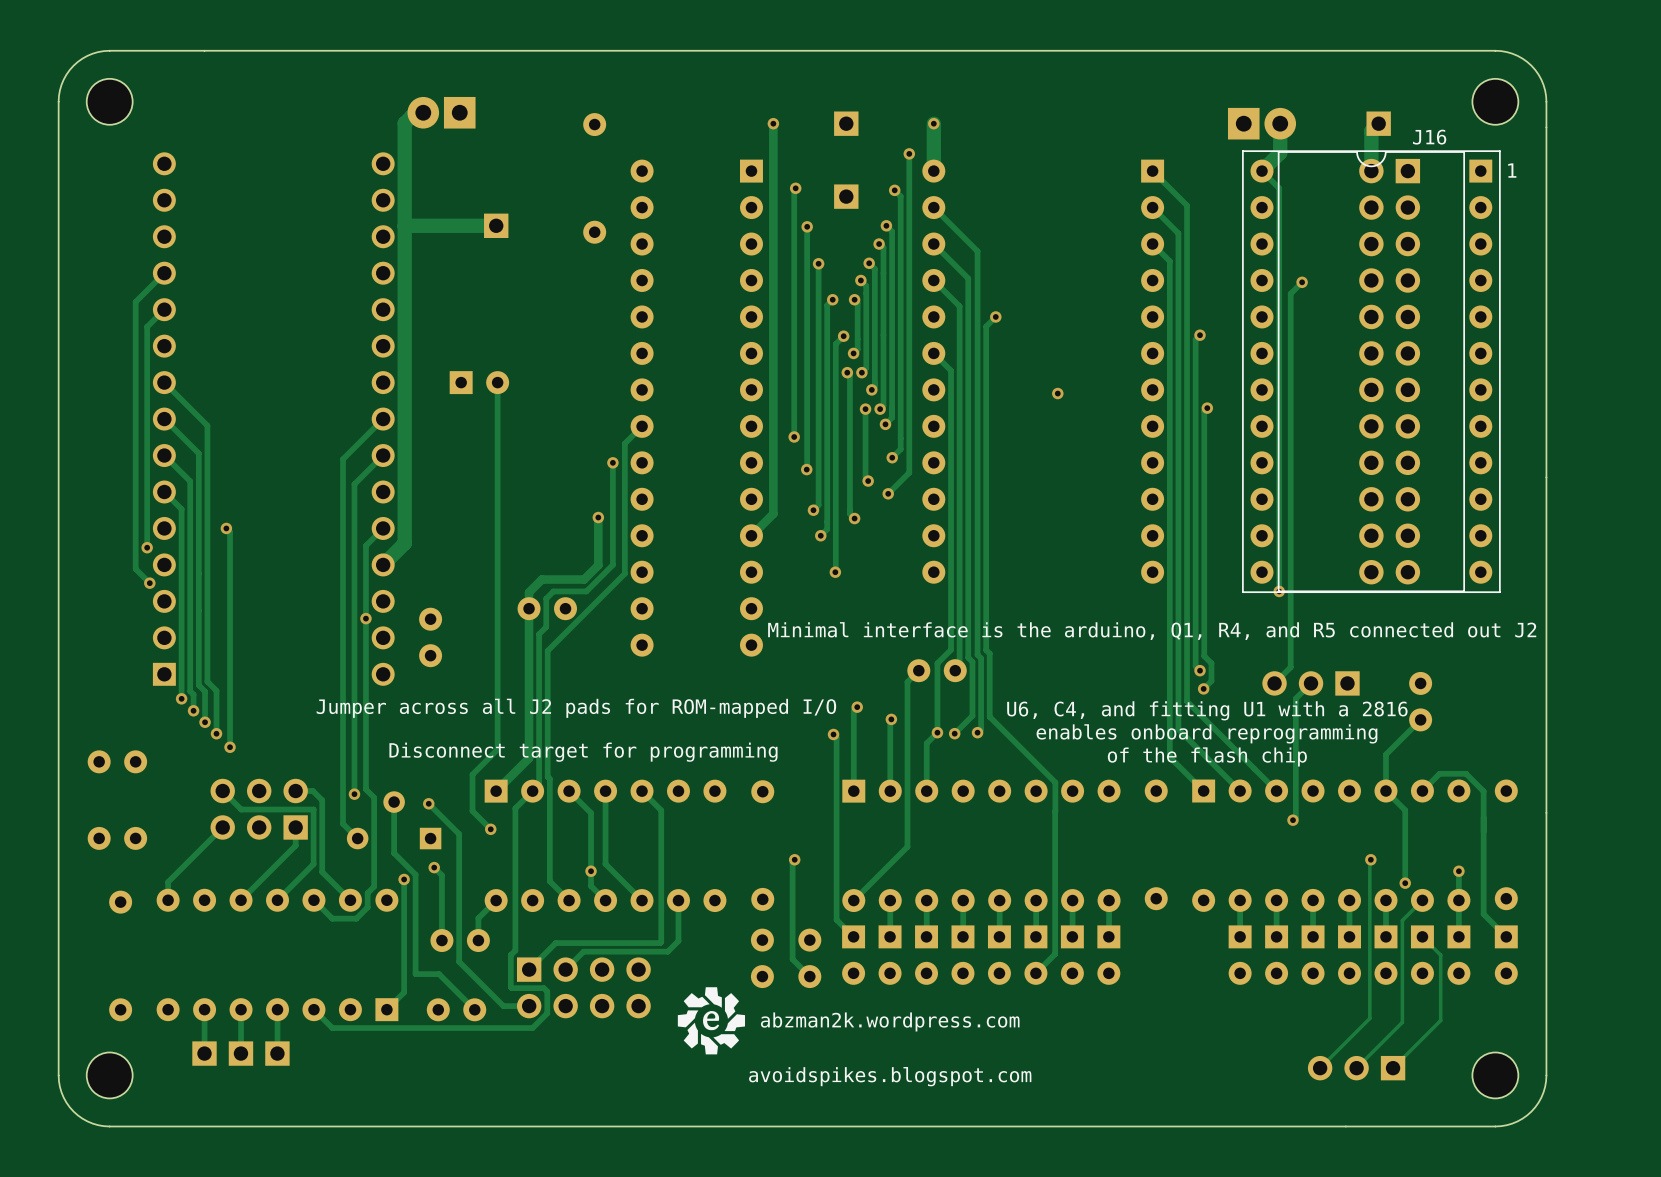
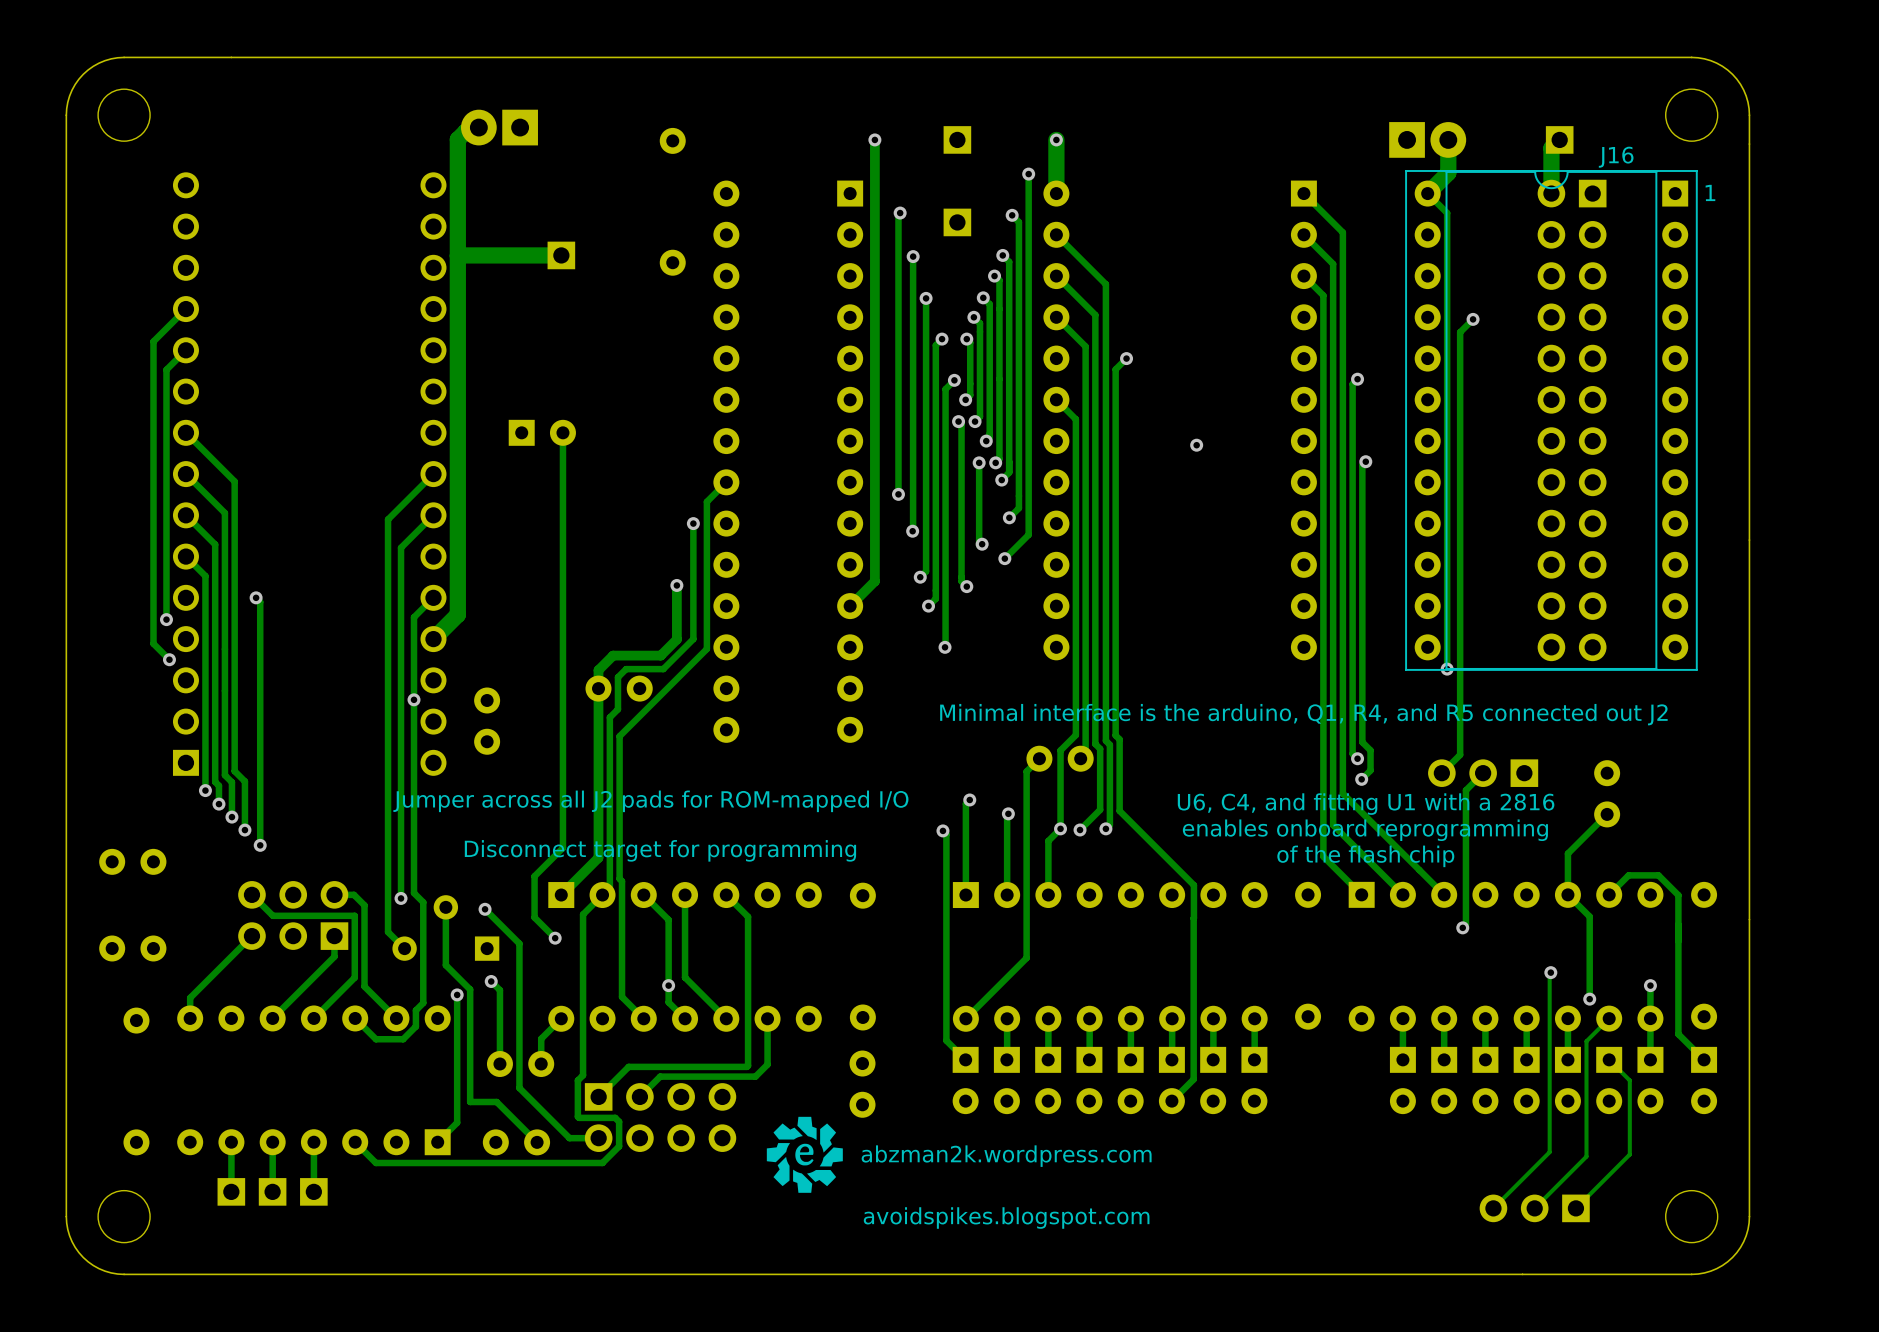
via: (794, 859) -> none
track: (795, 860) (792, 862) (792, 959) (809, 976) -> none
part: (809, 958) -> none

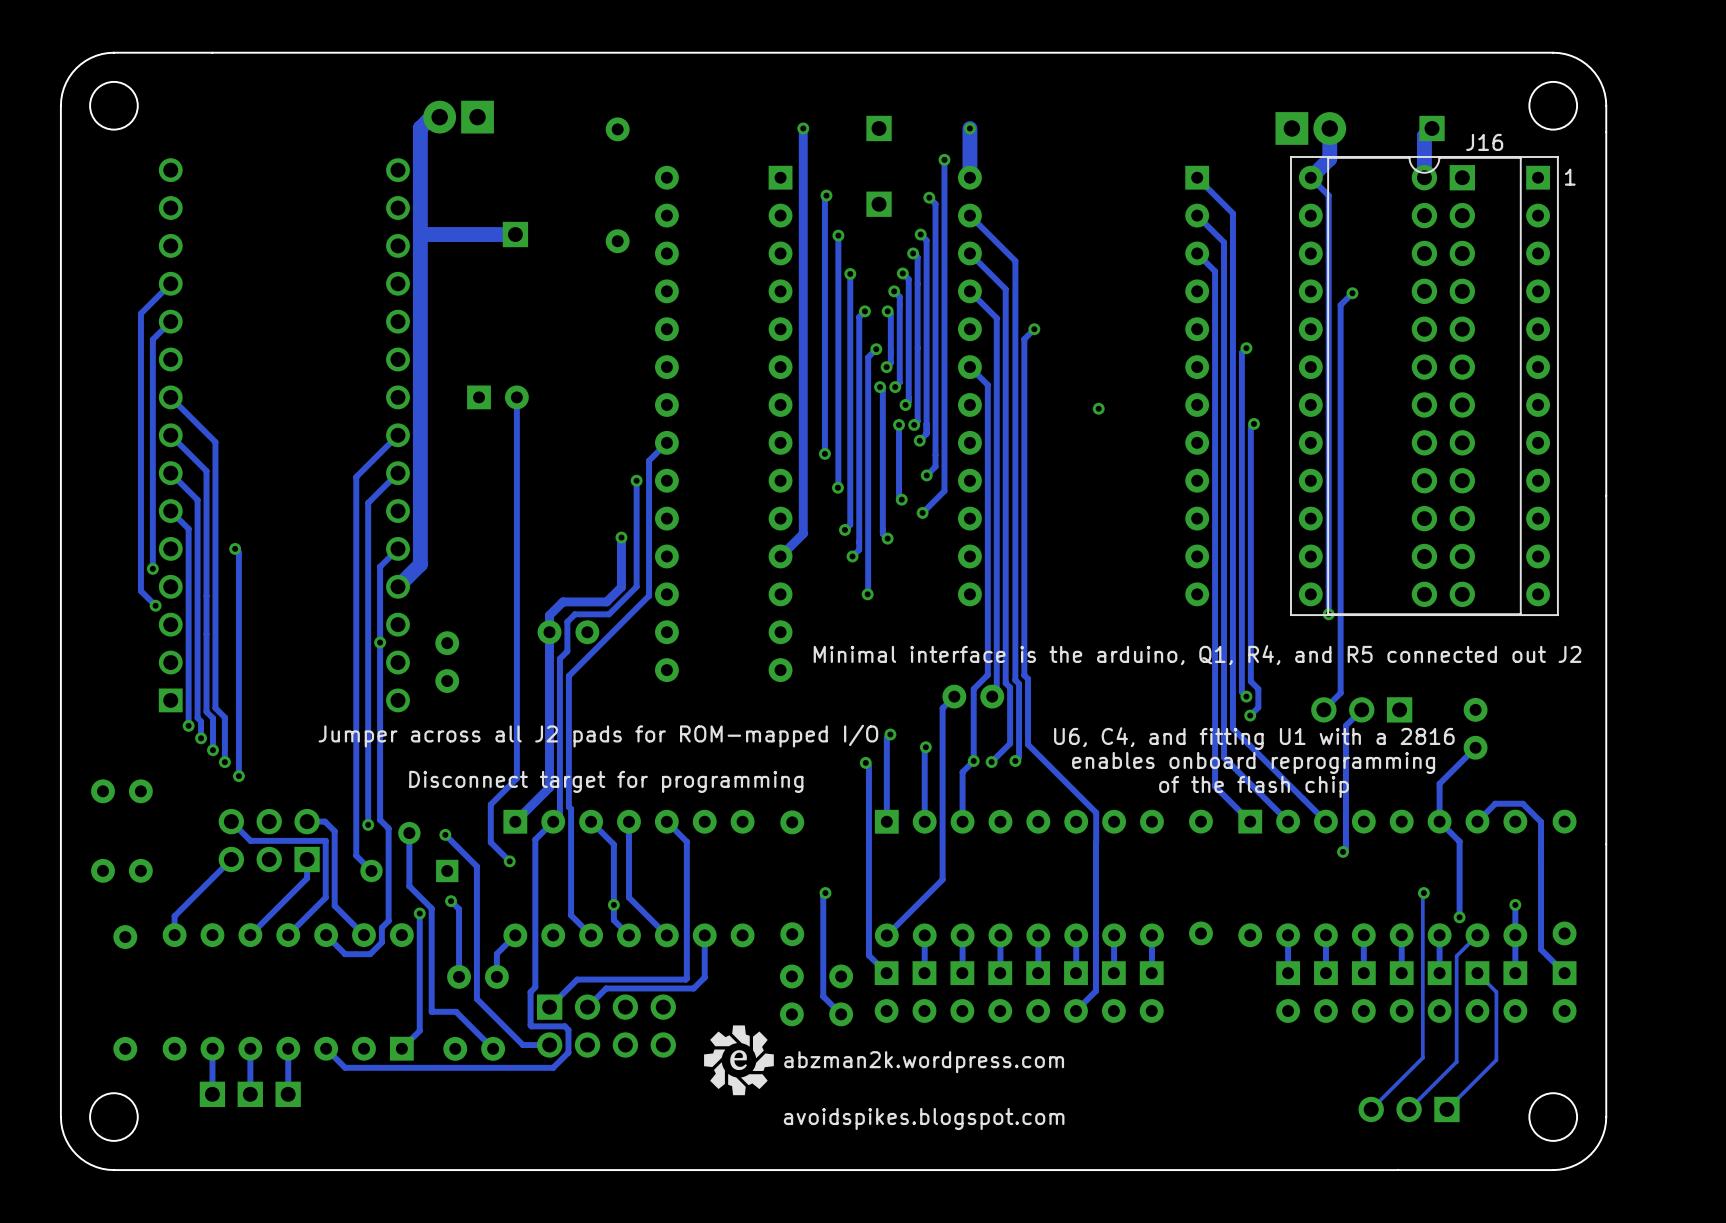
via: none -> (825, 893)
track: none -> (826, 893) (823, 896) (823, 996) (841, 1014)
part: none -> (841, 995)

